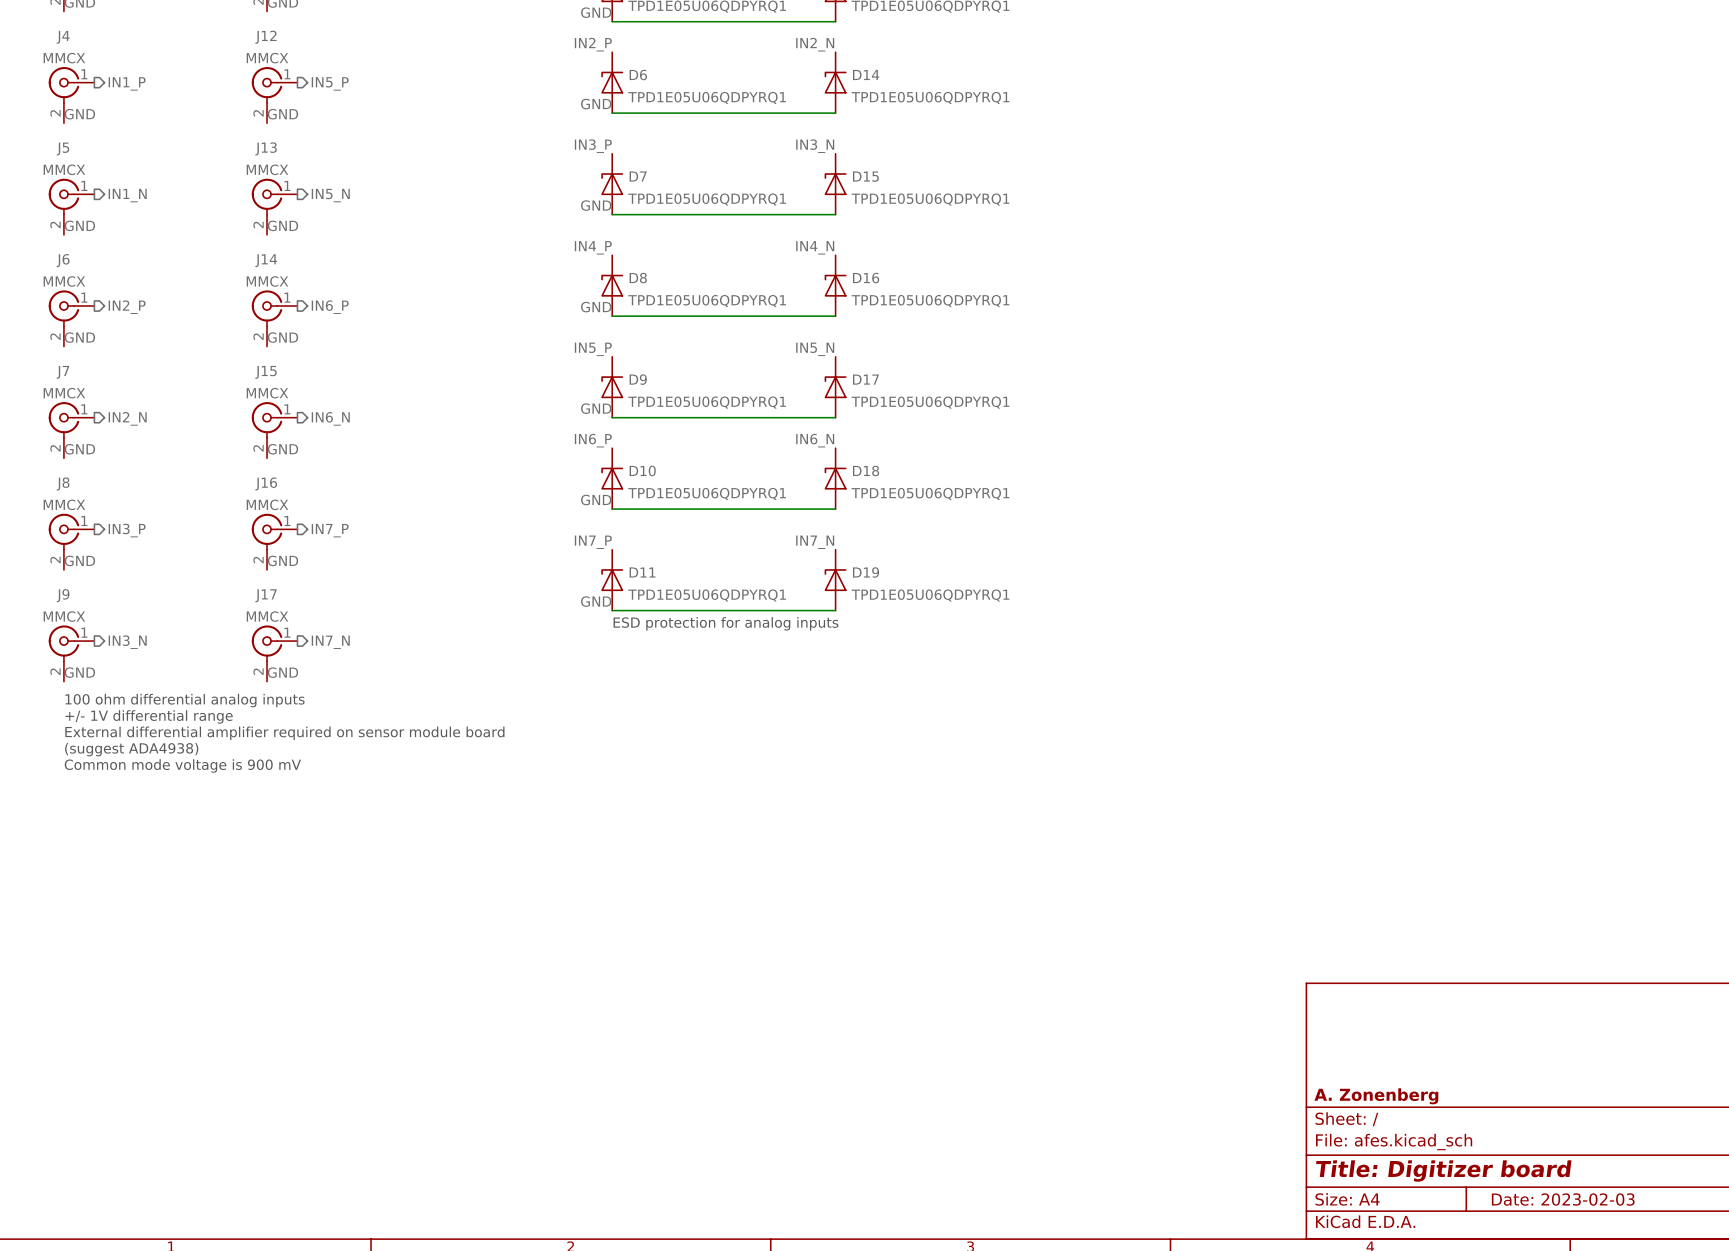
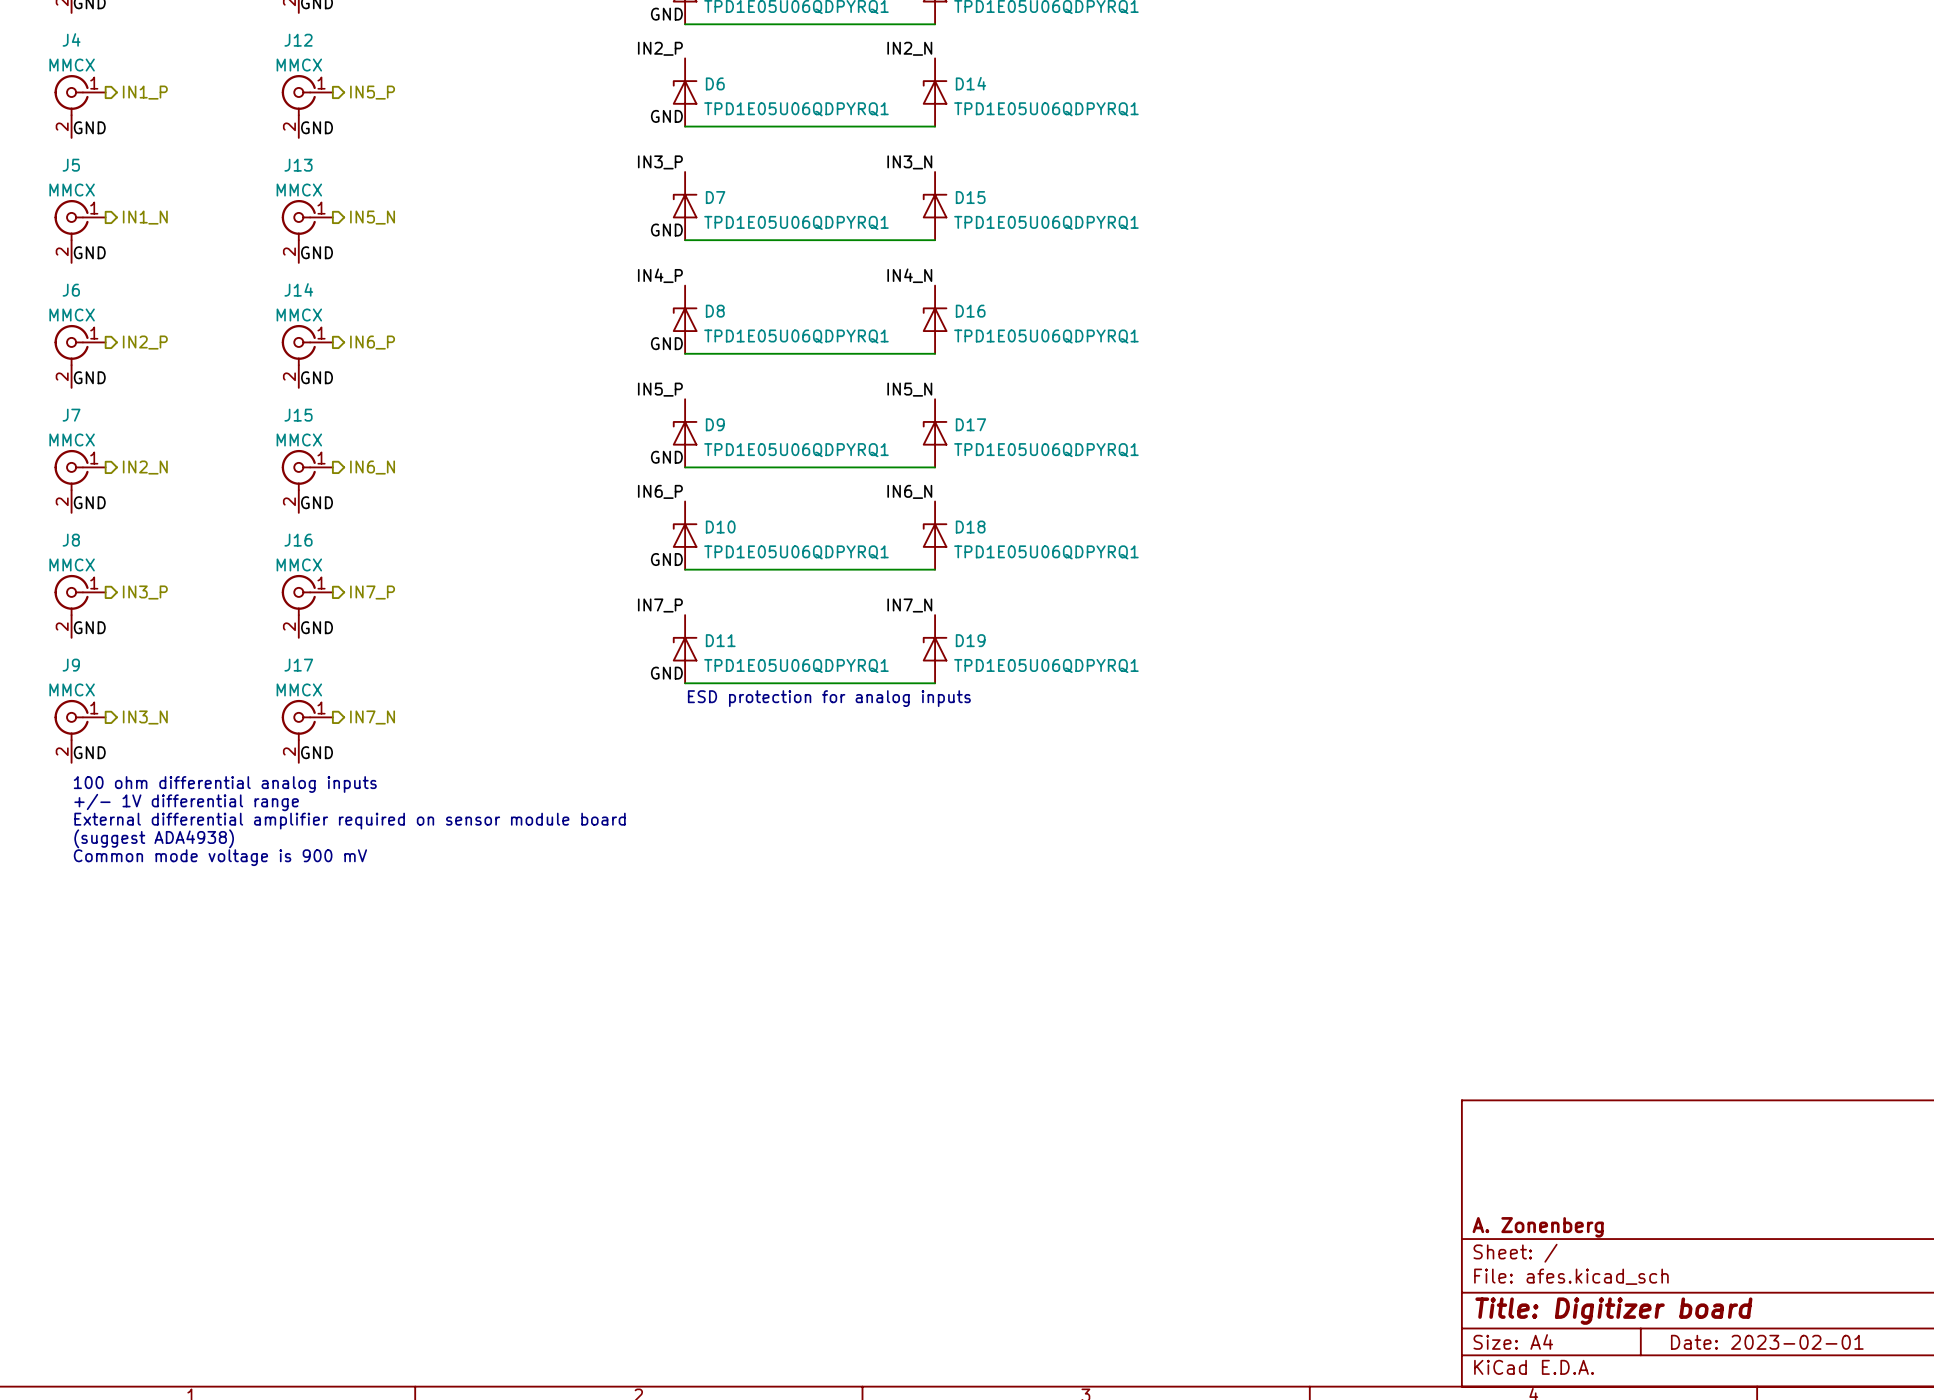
title block: Date: 2023-02-03 (1563, 1199) -> Date: 2023-02-01 (1767, 1342)

